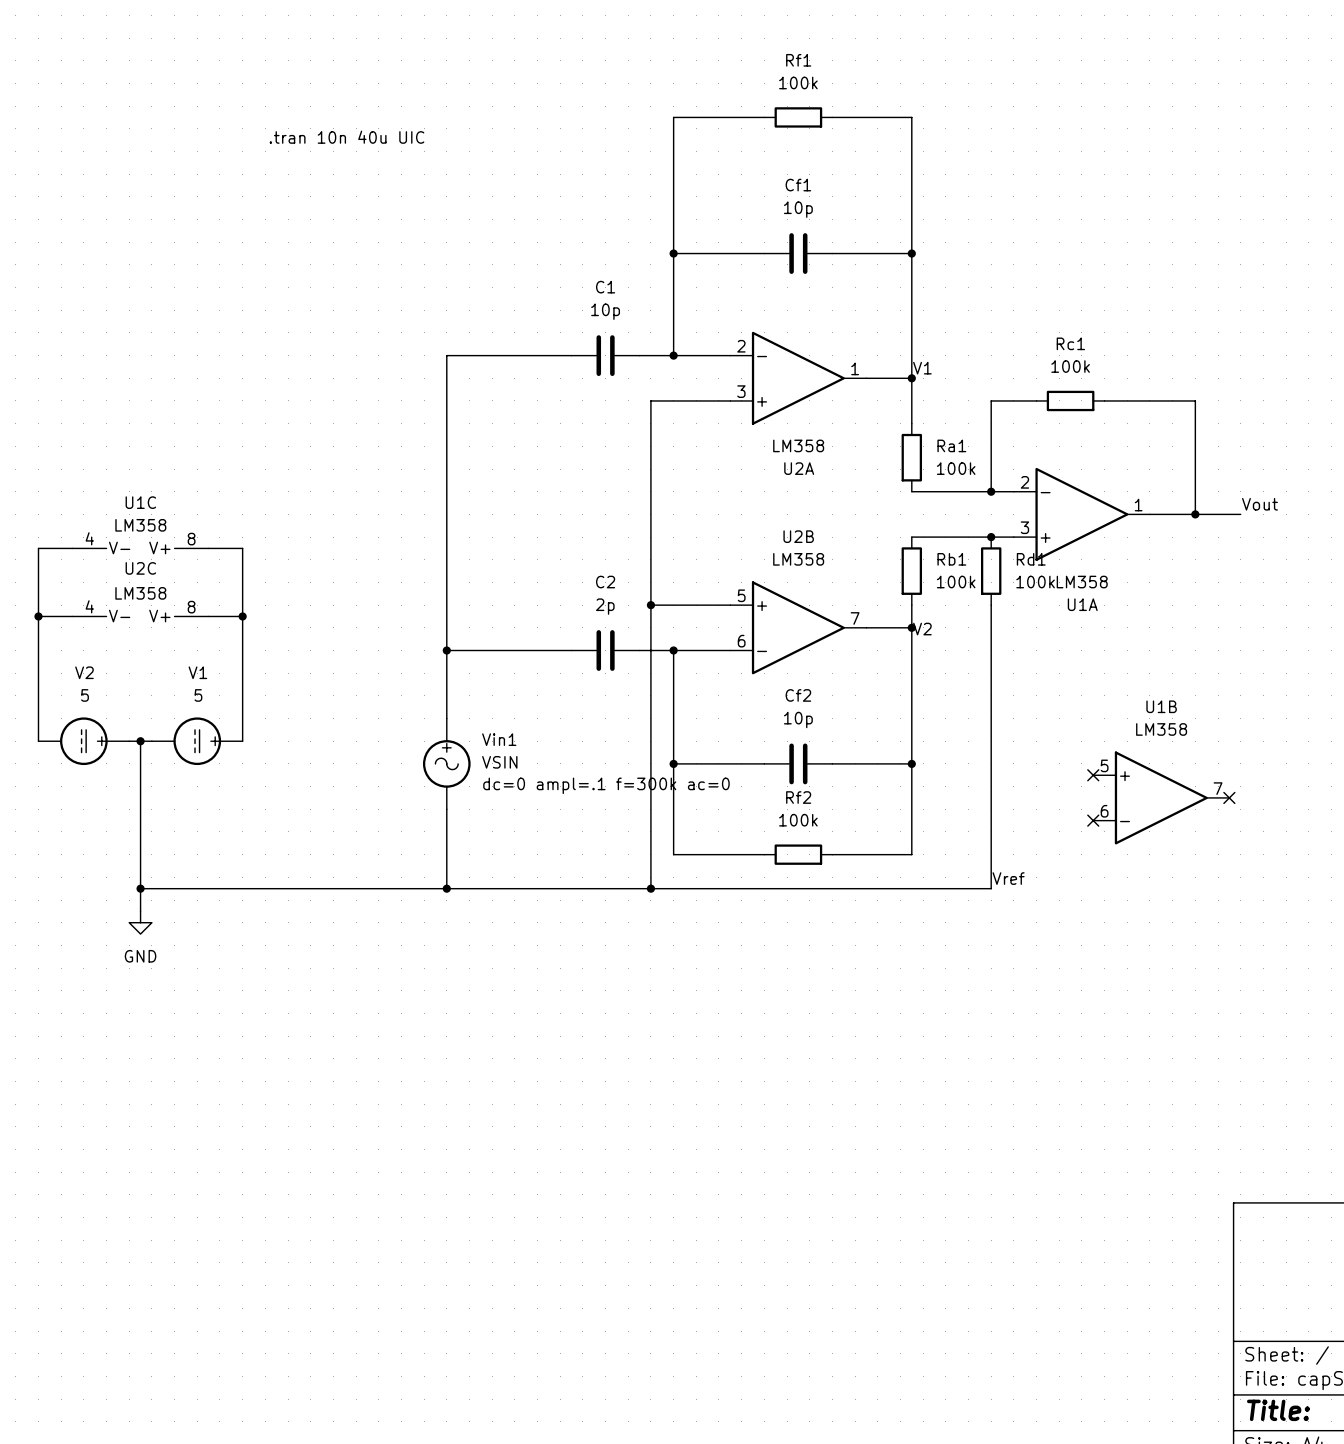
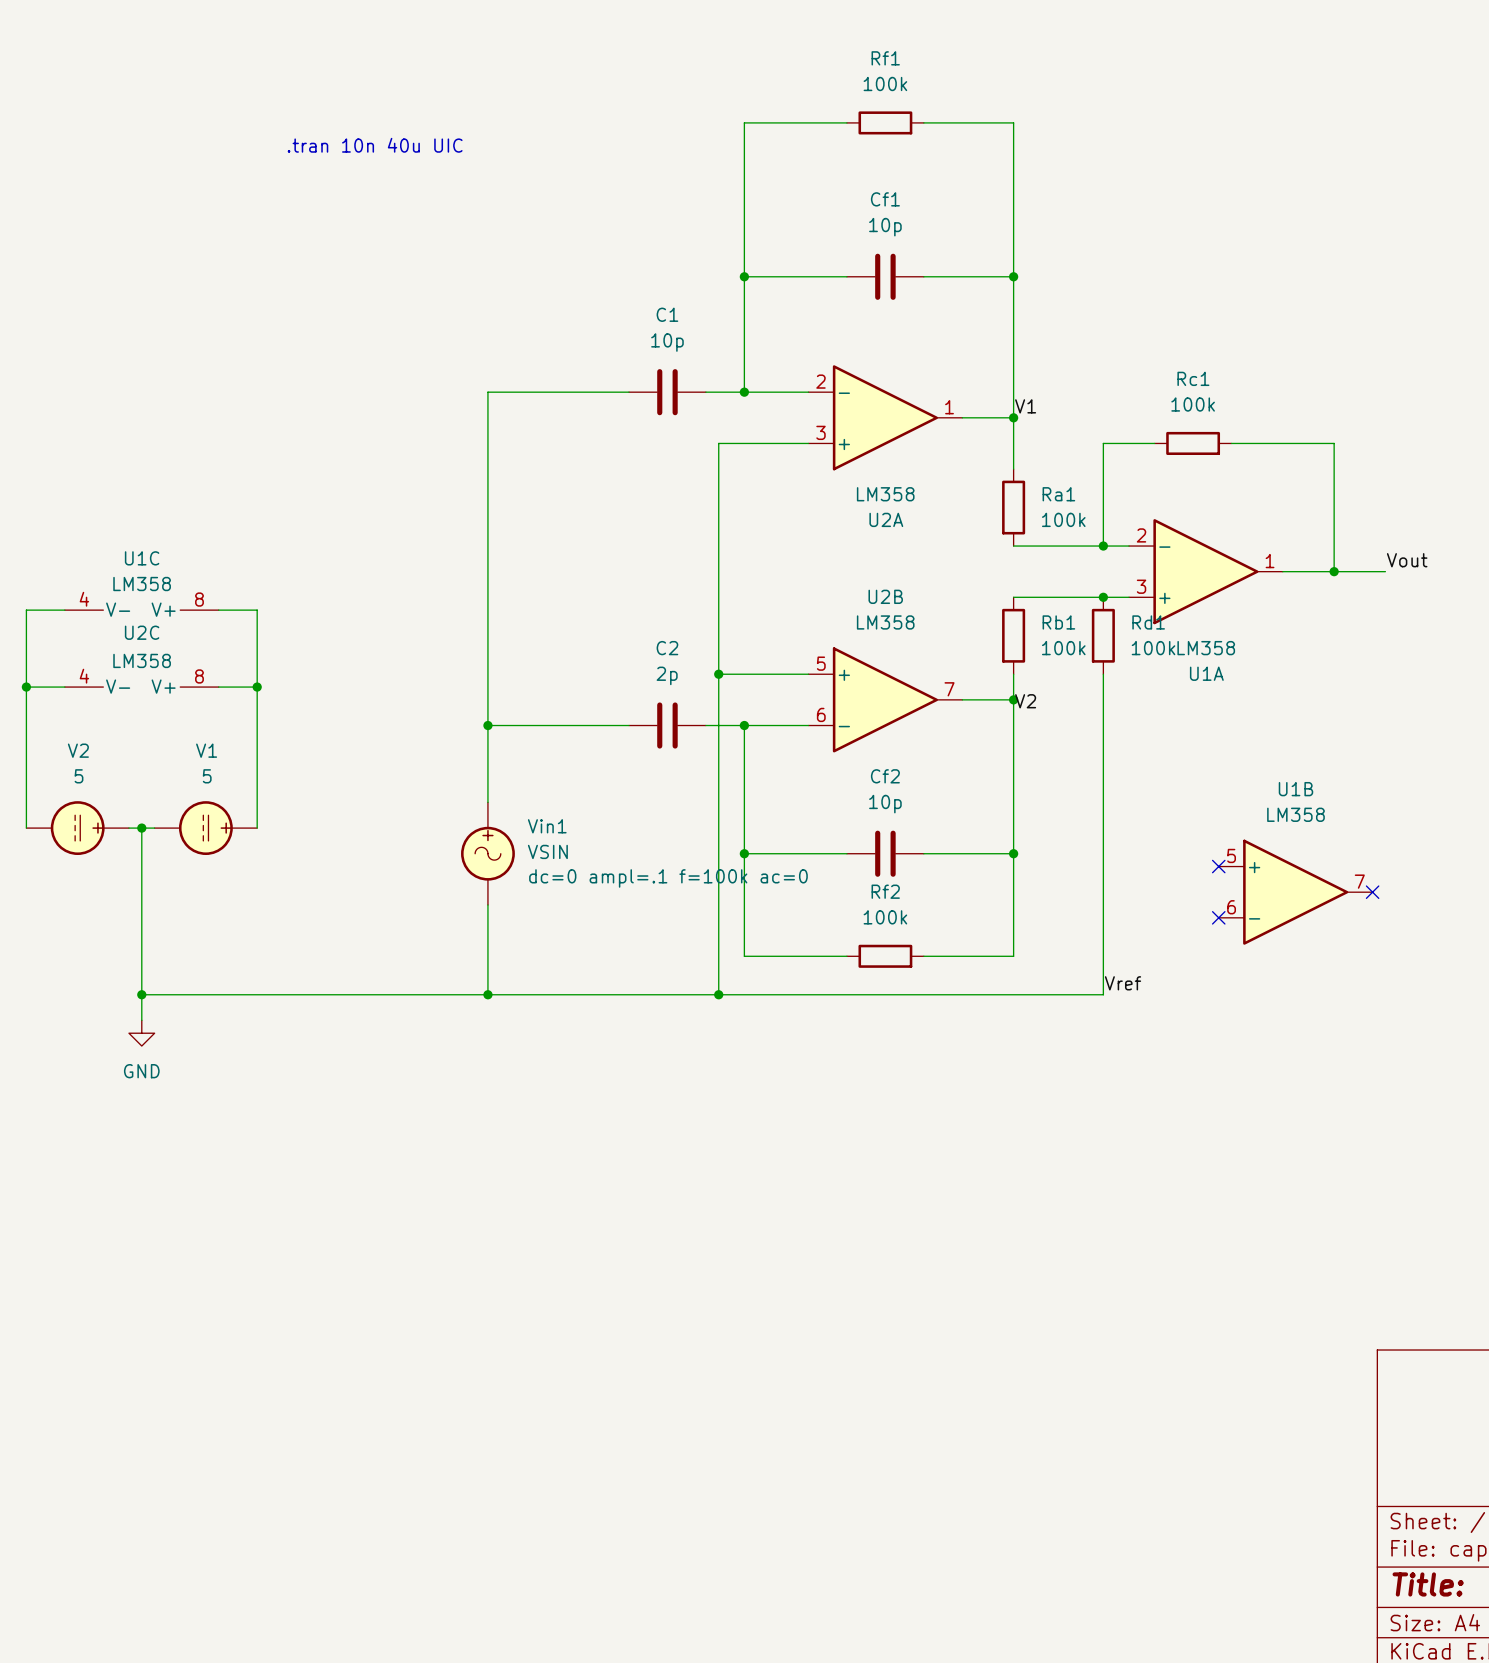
Vin1 text: dc=0 ampl=.1 f=300k ac=0 (606, 785) -> dc=0 ampl=.1 f=100k ac=0 (668, 878)

